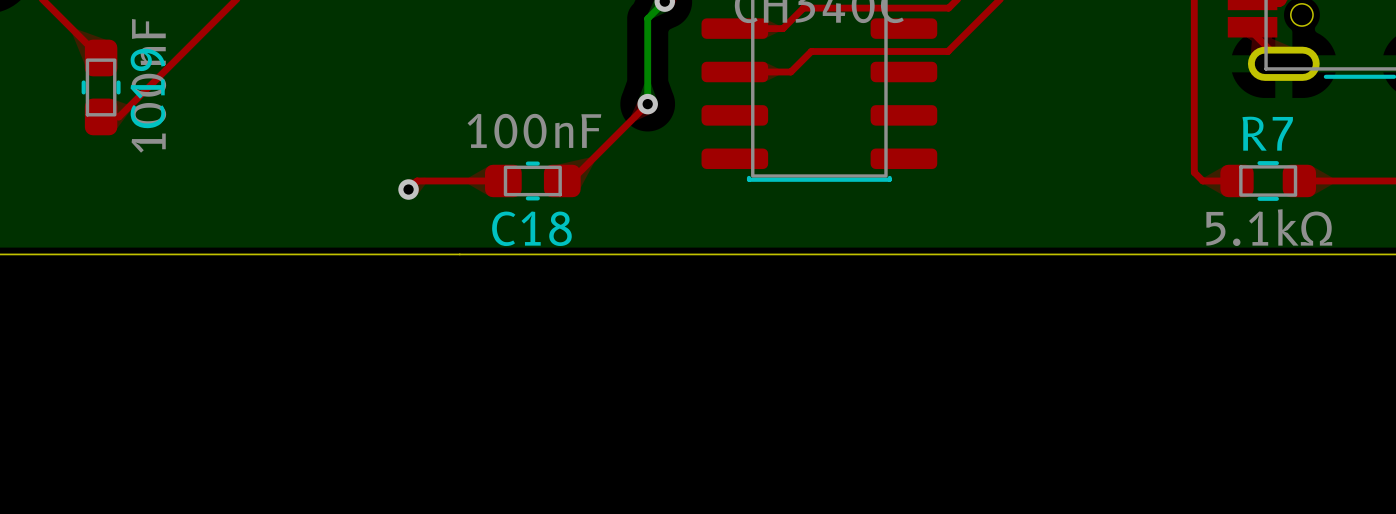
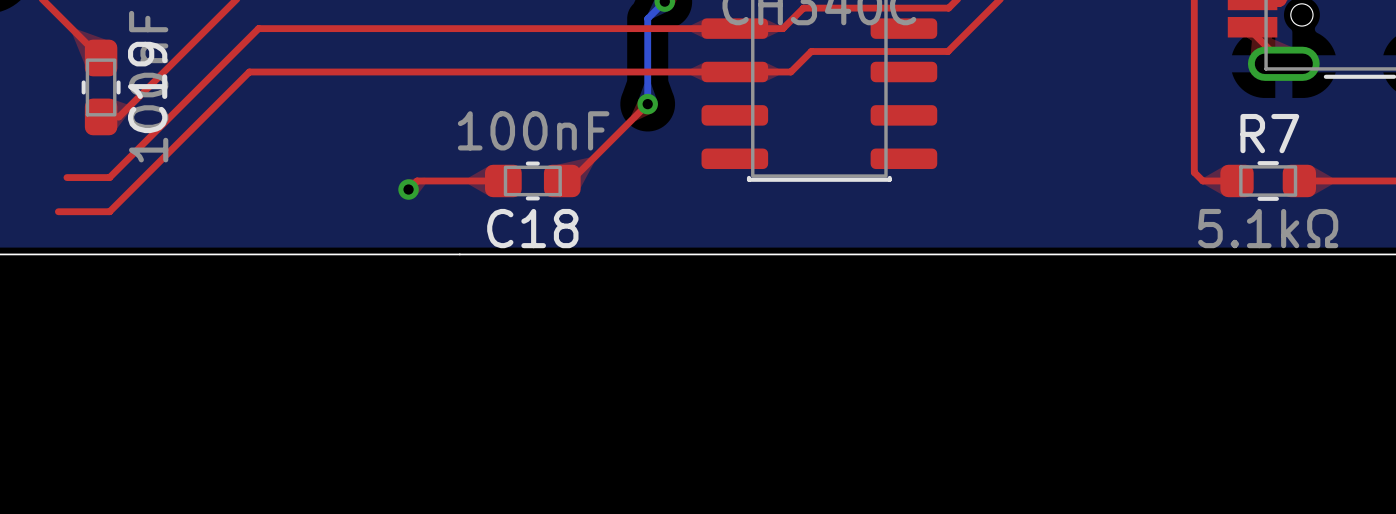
top track: none -> (734, 28) (258, 28) (109, 177) (66, 177)
top track: none -> (734, 72) (249, 72) (109, 211) (58, 211)

